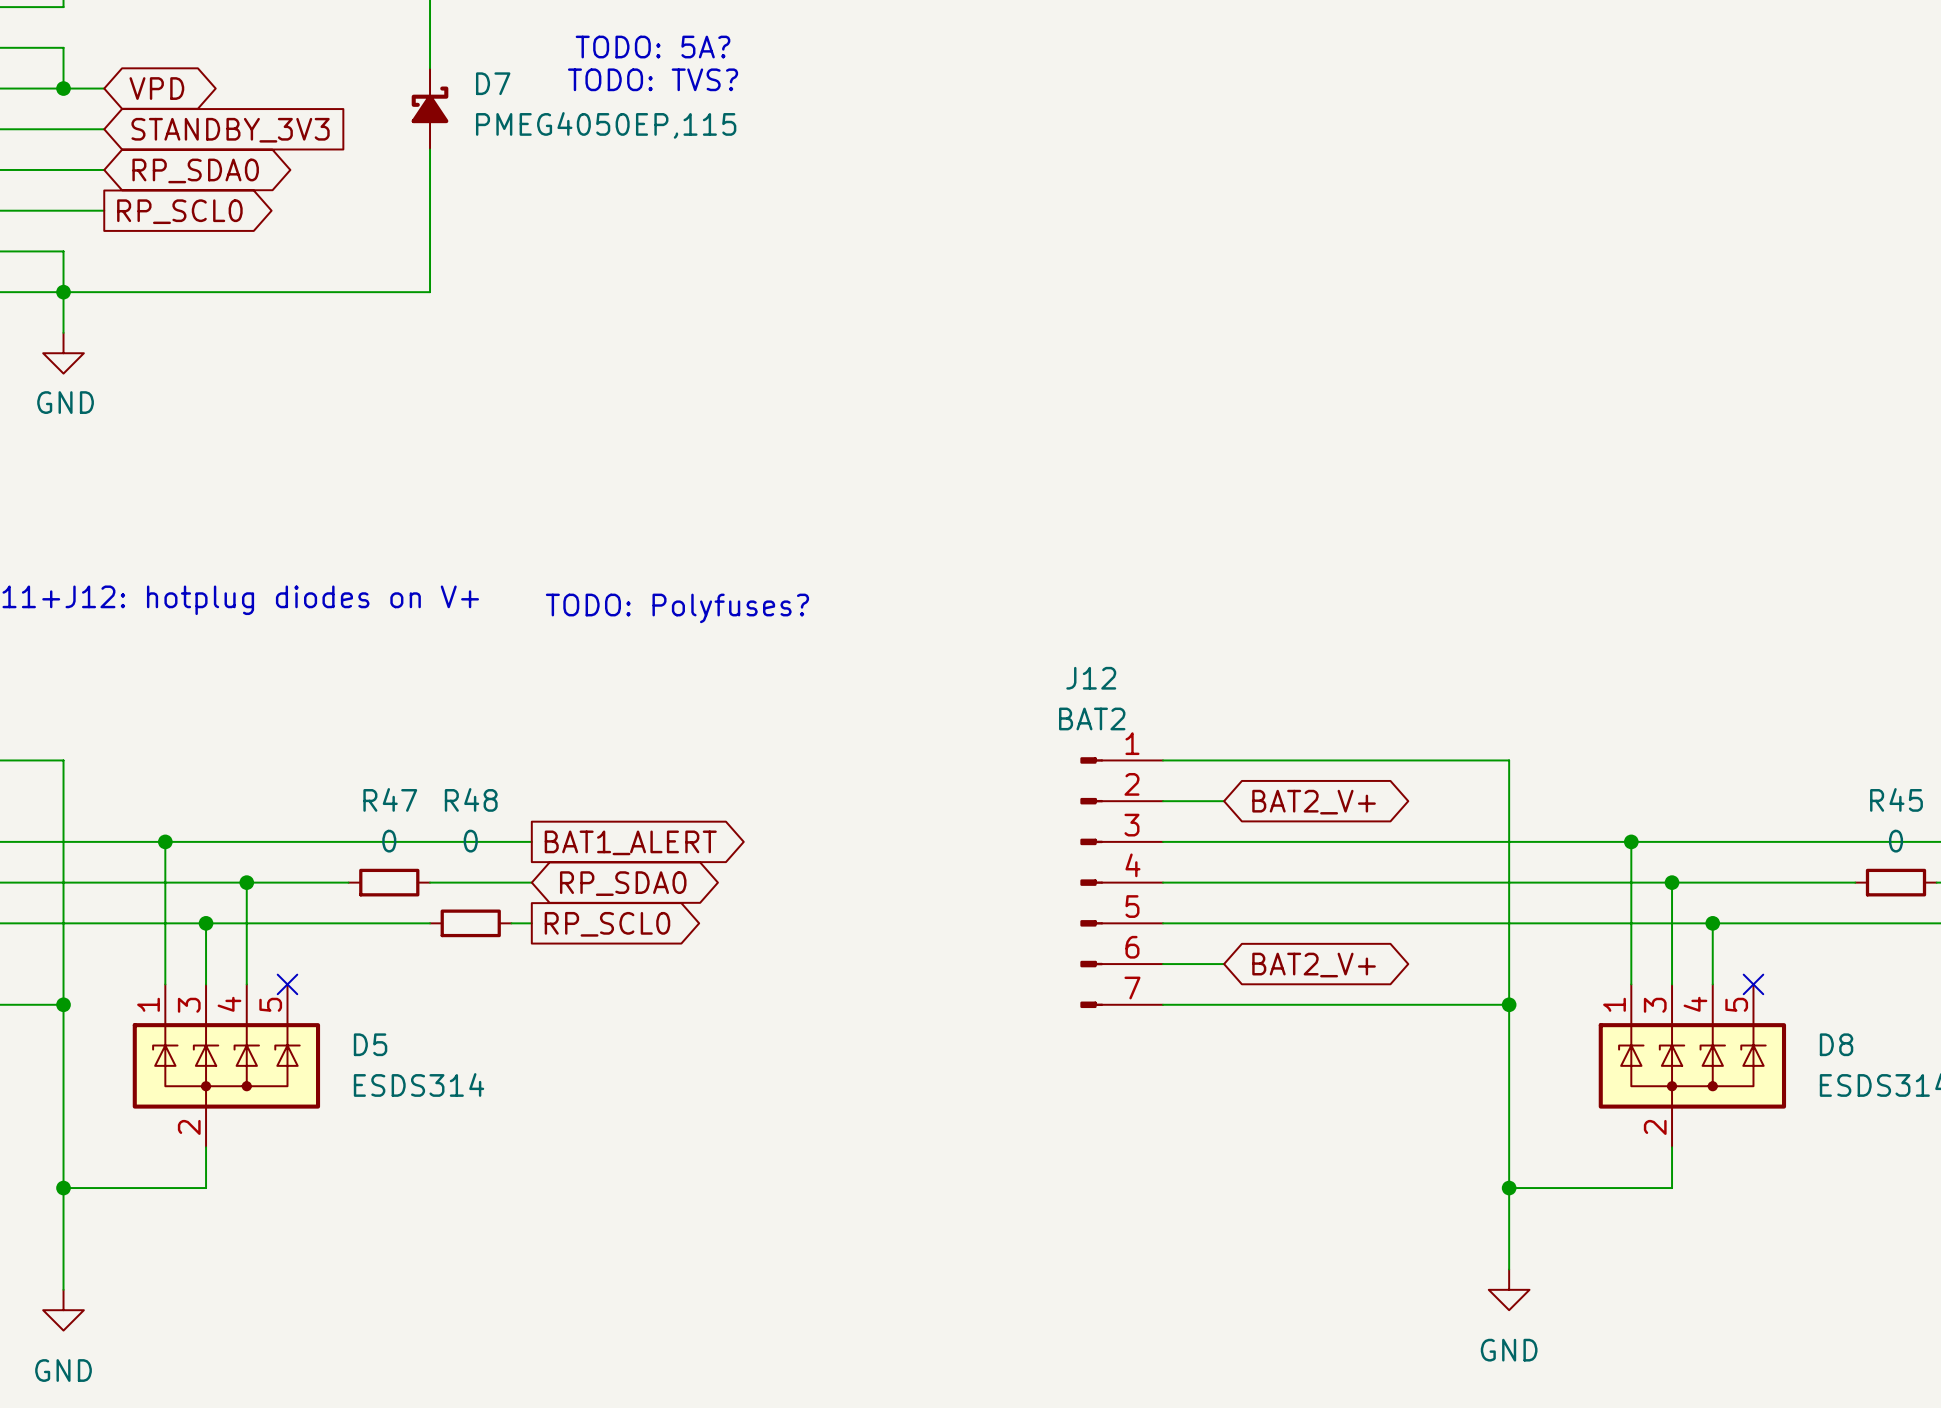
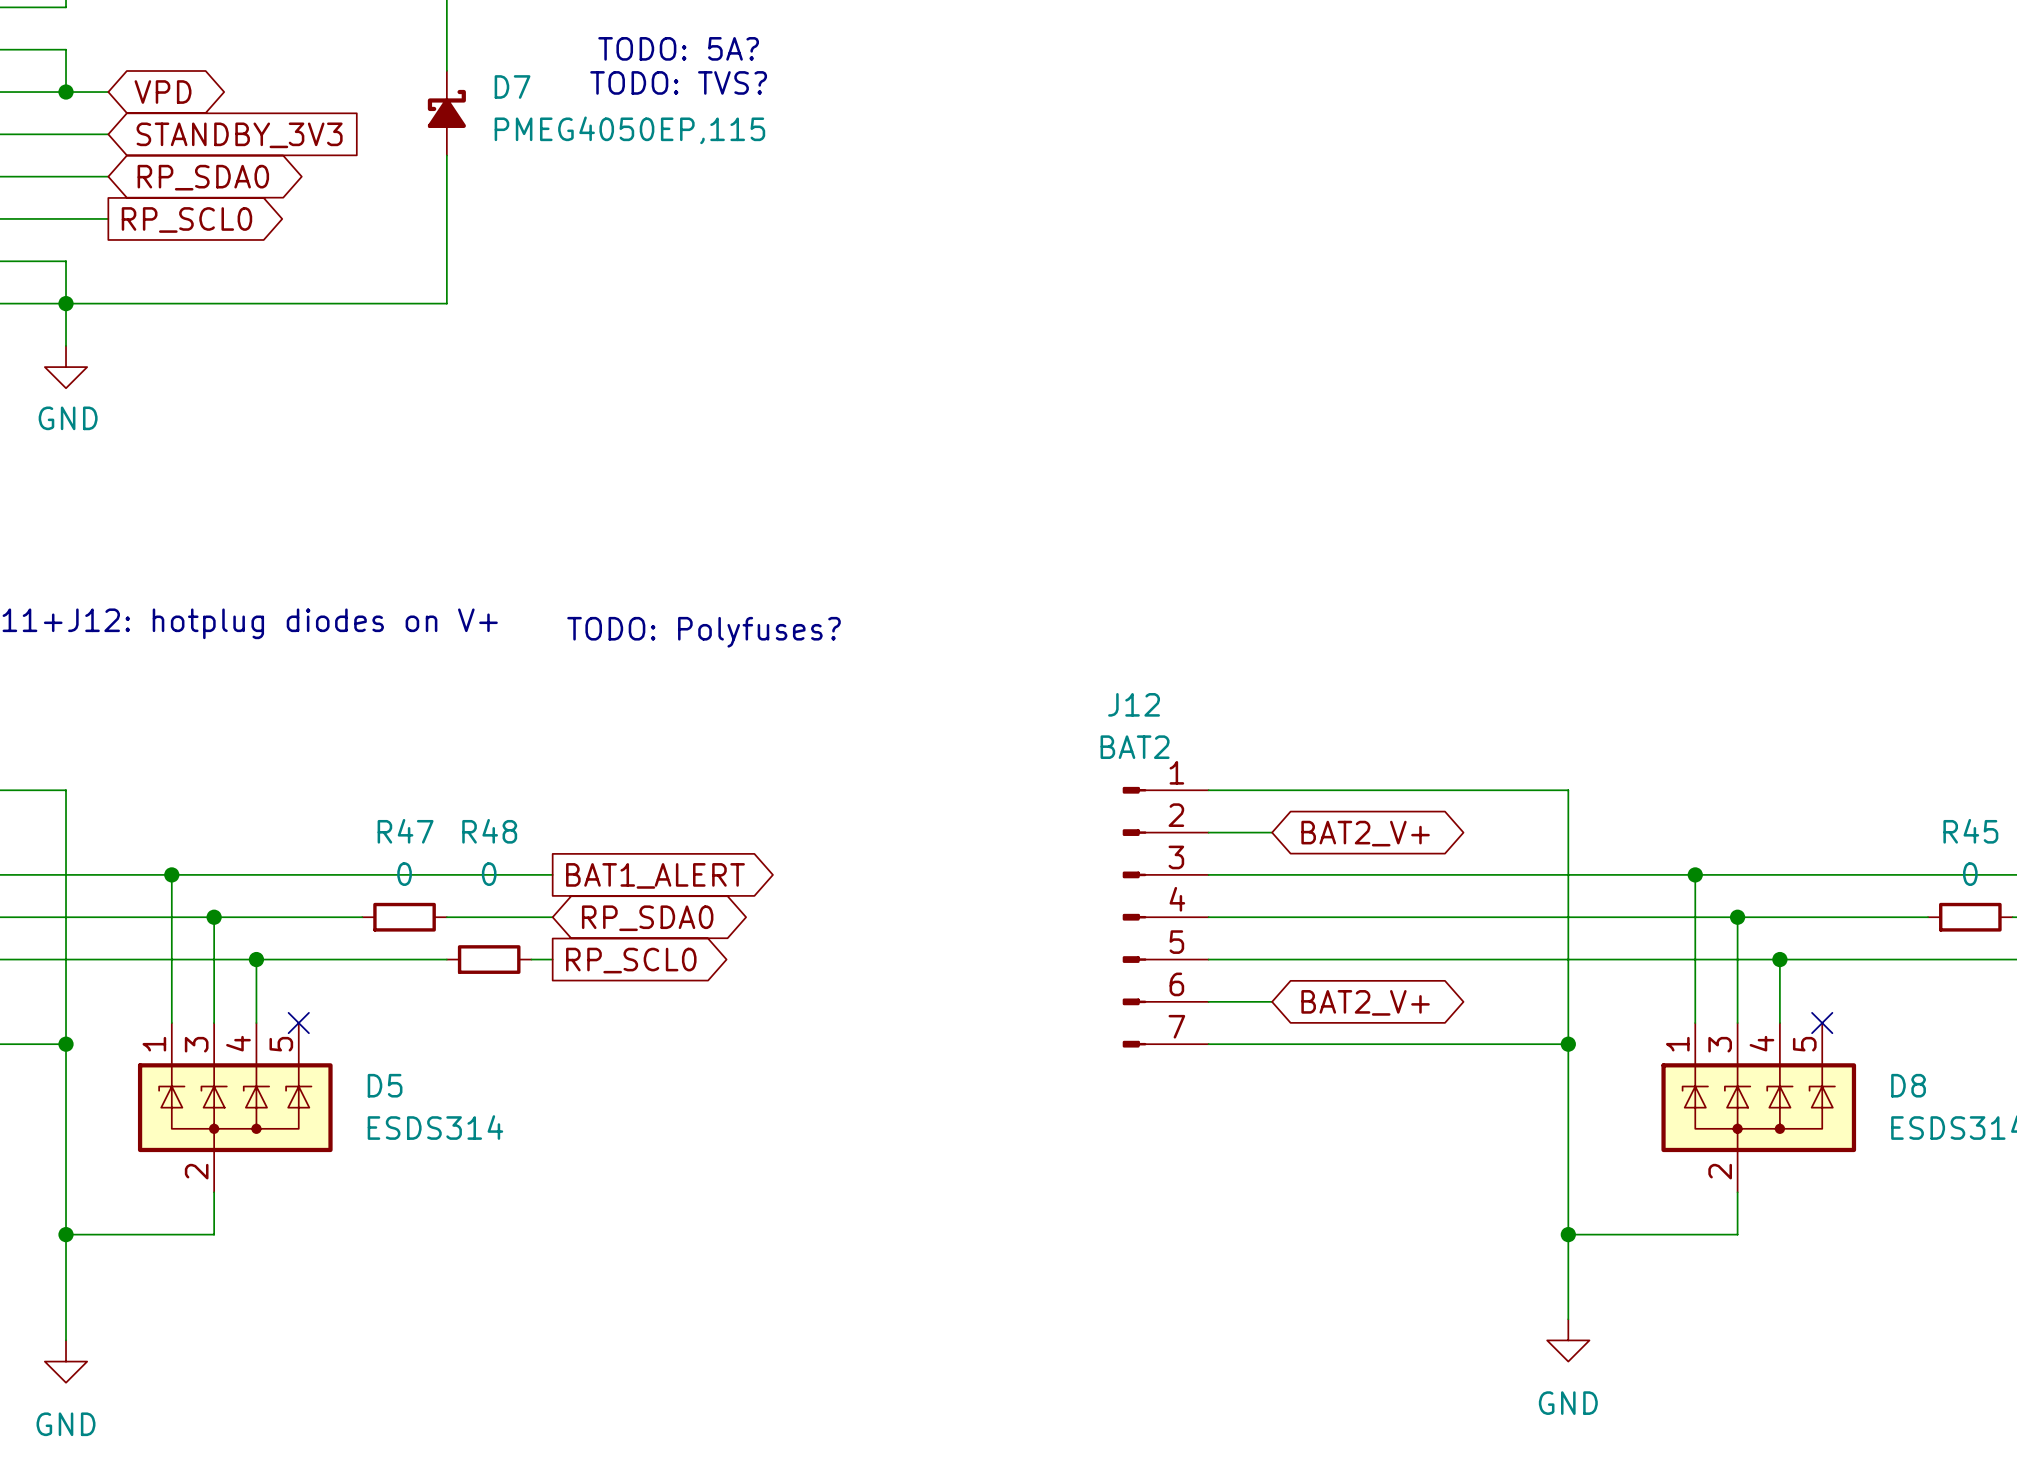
junction: none -> (214, 917)
wire: (246, 882) (246, 923) -> (214, 917) (214, 959)
junction: (246, 882) -> none
junction: (206, 923) -> none
junction: none -> (256, 959)

